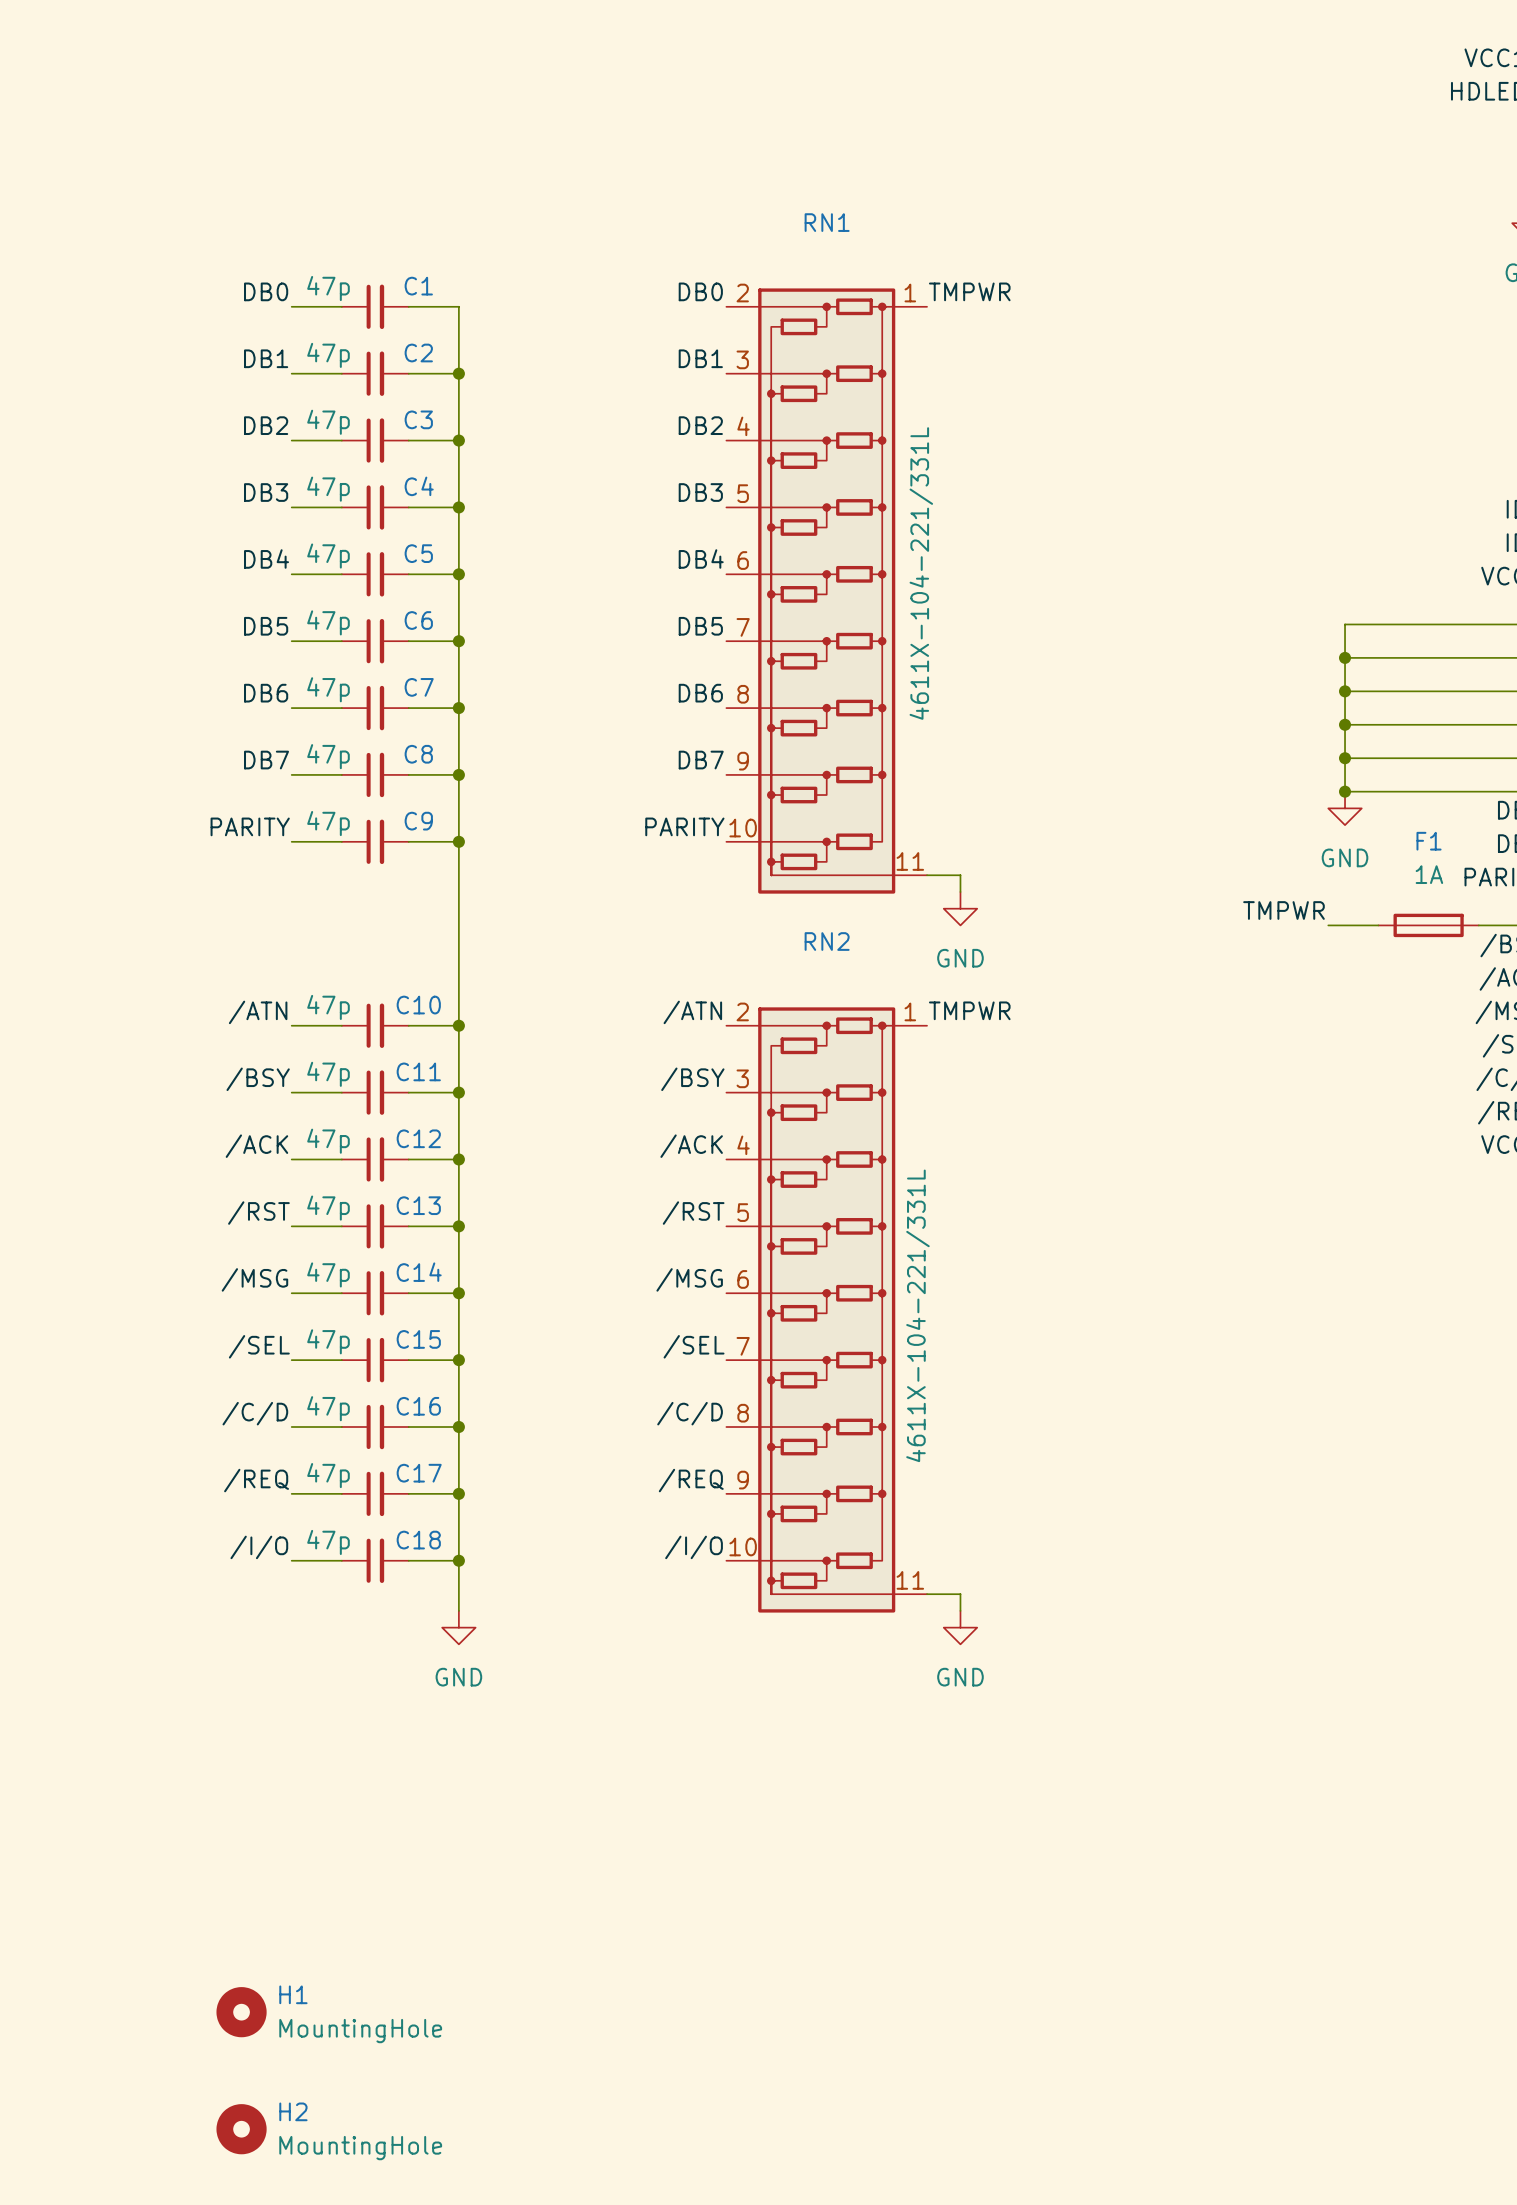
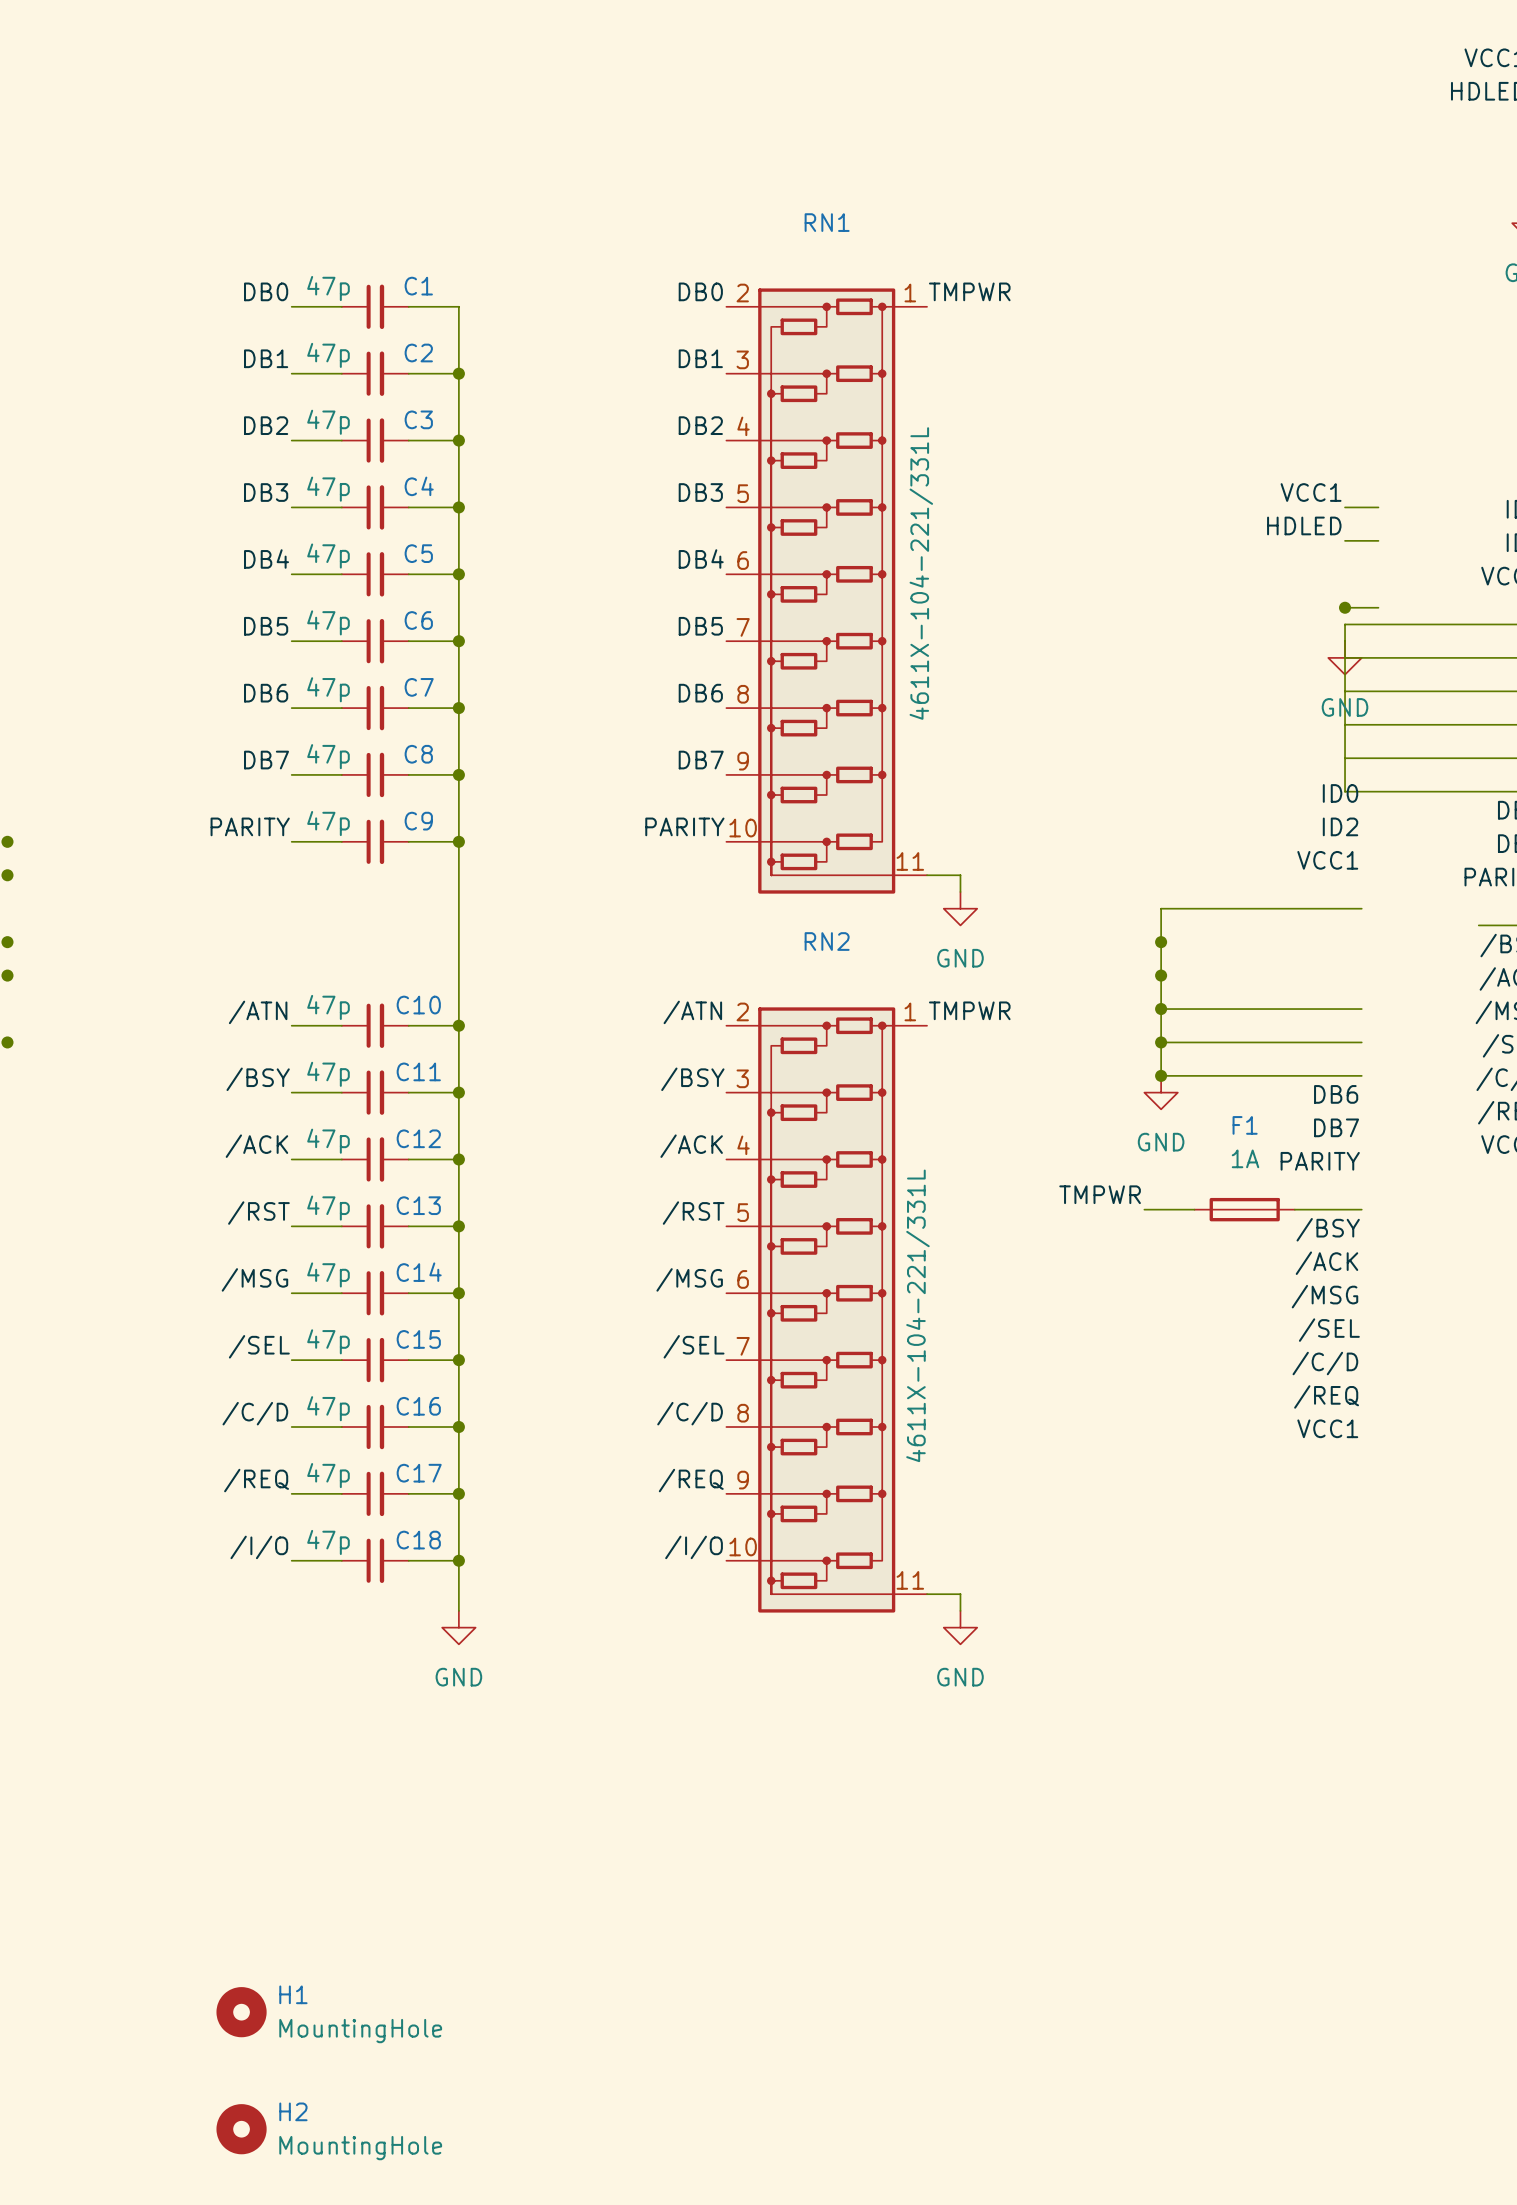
label: none -> VCC1 (1311, 492)
wire: none -> (1345, 507) (1378, 507)
label: none -> HDLED (1304, 525)
wire: none -> (1345, 540) (1378, 540)
wire: none -> (1345, 607) (1378, 607)
junction: none -> (1345, 607)
junction: (1345, 657) -> none
junction: (1345, 691) -> none
junction: (1345, 724) -> none
junction: (1345, 758) -> none
junction: (1345, 791) -> none
label: none -> ID0 (1340, 793)
power symbol position: GND (1345, 808) -> GND (1345, 657)
label: none -> ID2 (1340, 826)
junction: none -> (7, 841)
label: none -> VCC1 (1327, 860)
junction: none -> (7, 875)
wire: none -> (1361, 908) (1161, 908) (1161, 1075) (1361, 1075)
label: TMPWR (1283, 910) -> none
wire: (1328, 925) (1378, 925) -> none
F1 position: (1428, 925) -> (1244, 1209)
junction: none -> (7, 942)
junction: none -> (1161, 942)
junction: none -> (7, 975)
junction: none -> (1161, 975)
wire: none -> (1161, 1009) (1361, 1009)
junction: none -> (1161, 1009)
junction: none -> (7, 1042)
wire: none -> (1161, 1042) (1361, 1042)
junction: none -> (1161, 1042)
junction: none -> (1161, 1075)
power symbol: none -> GND (1161, 1092)
label: none -> DB6 (1336, 1094)
label: none -> DB7 (1336, 1127)
label: none -> PARITY (1320, 1161)
label: none -> TMPWR (1100, 1194)
wire: none -> (1144, 1209) (1194, 1209)
wire: none -> (1294, 1209) (1361, 1209)
label: none -> /BSY (1328, 1229)
label: none -> /ACK (1326, 1263)
label: none -> /MSG (1324, 1296)
label: none -> /SEL (1329, 1330)
label: none -> /C/D (1325, 1363)
label: none -> /REQ (1326, 1396)
label: none -> VCC1 (1327, 1428)

